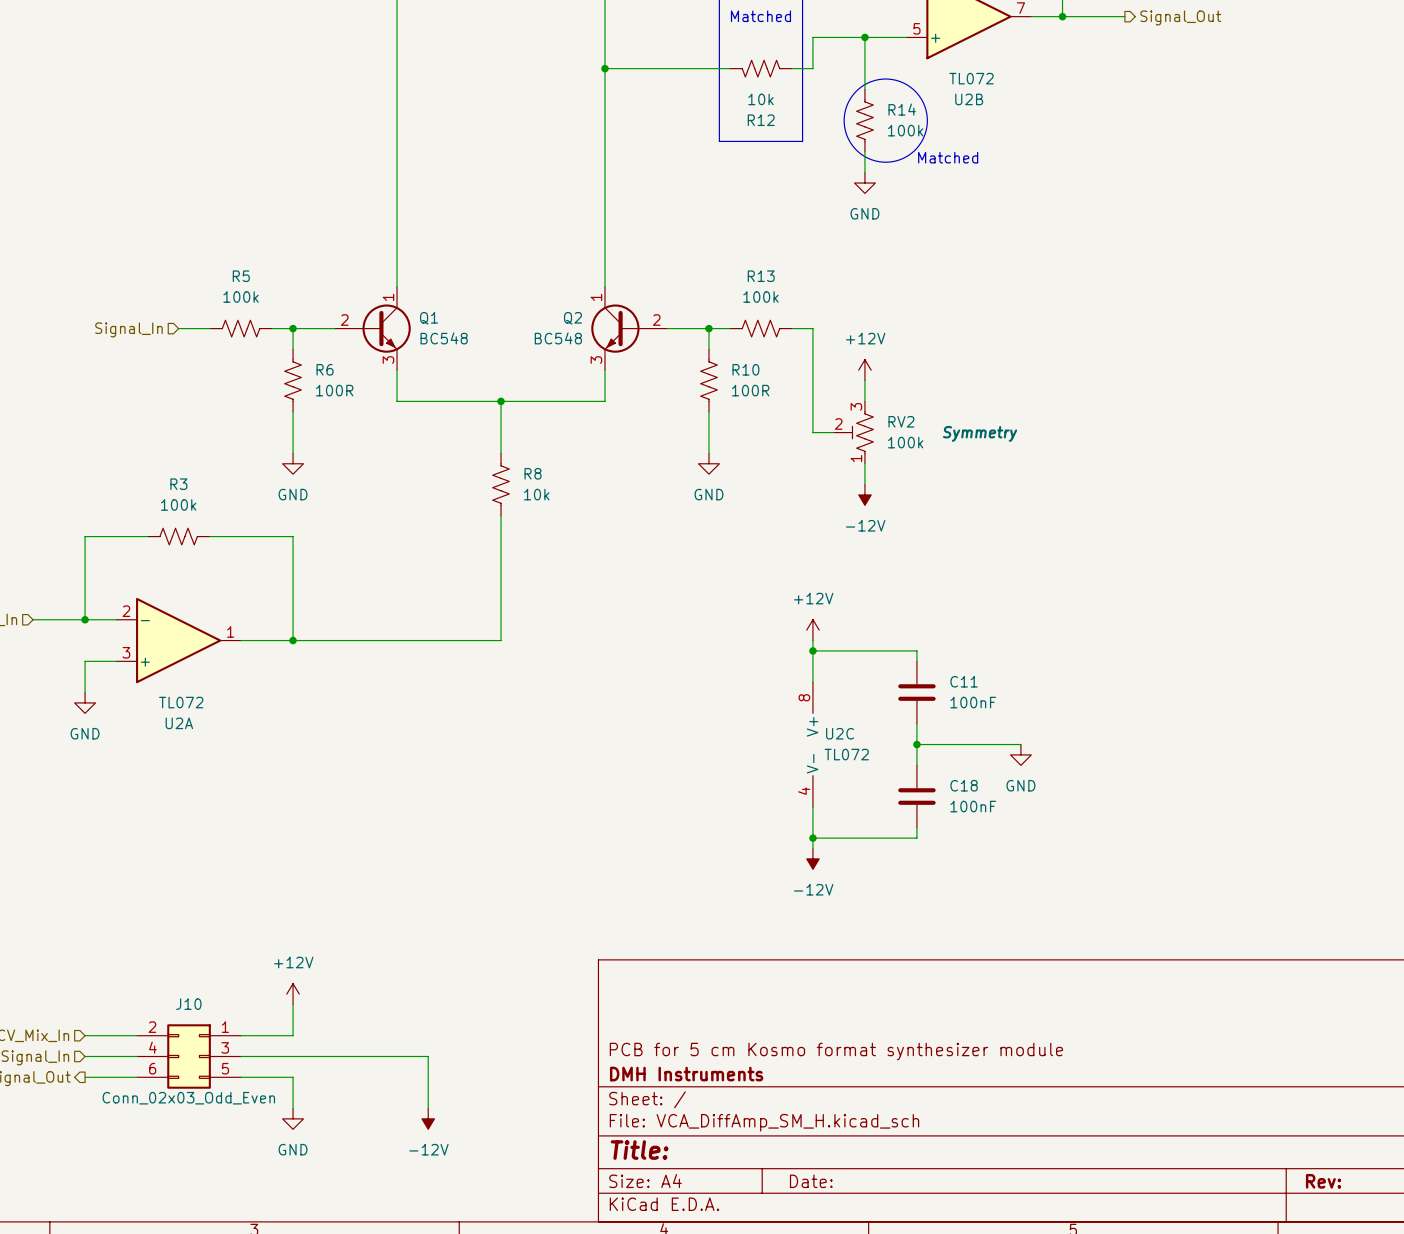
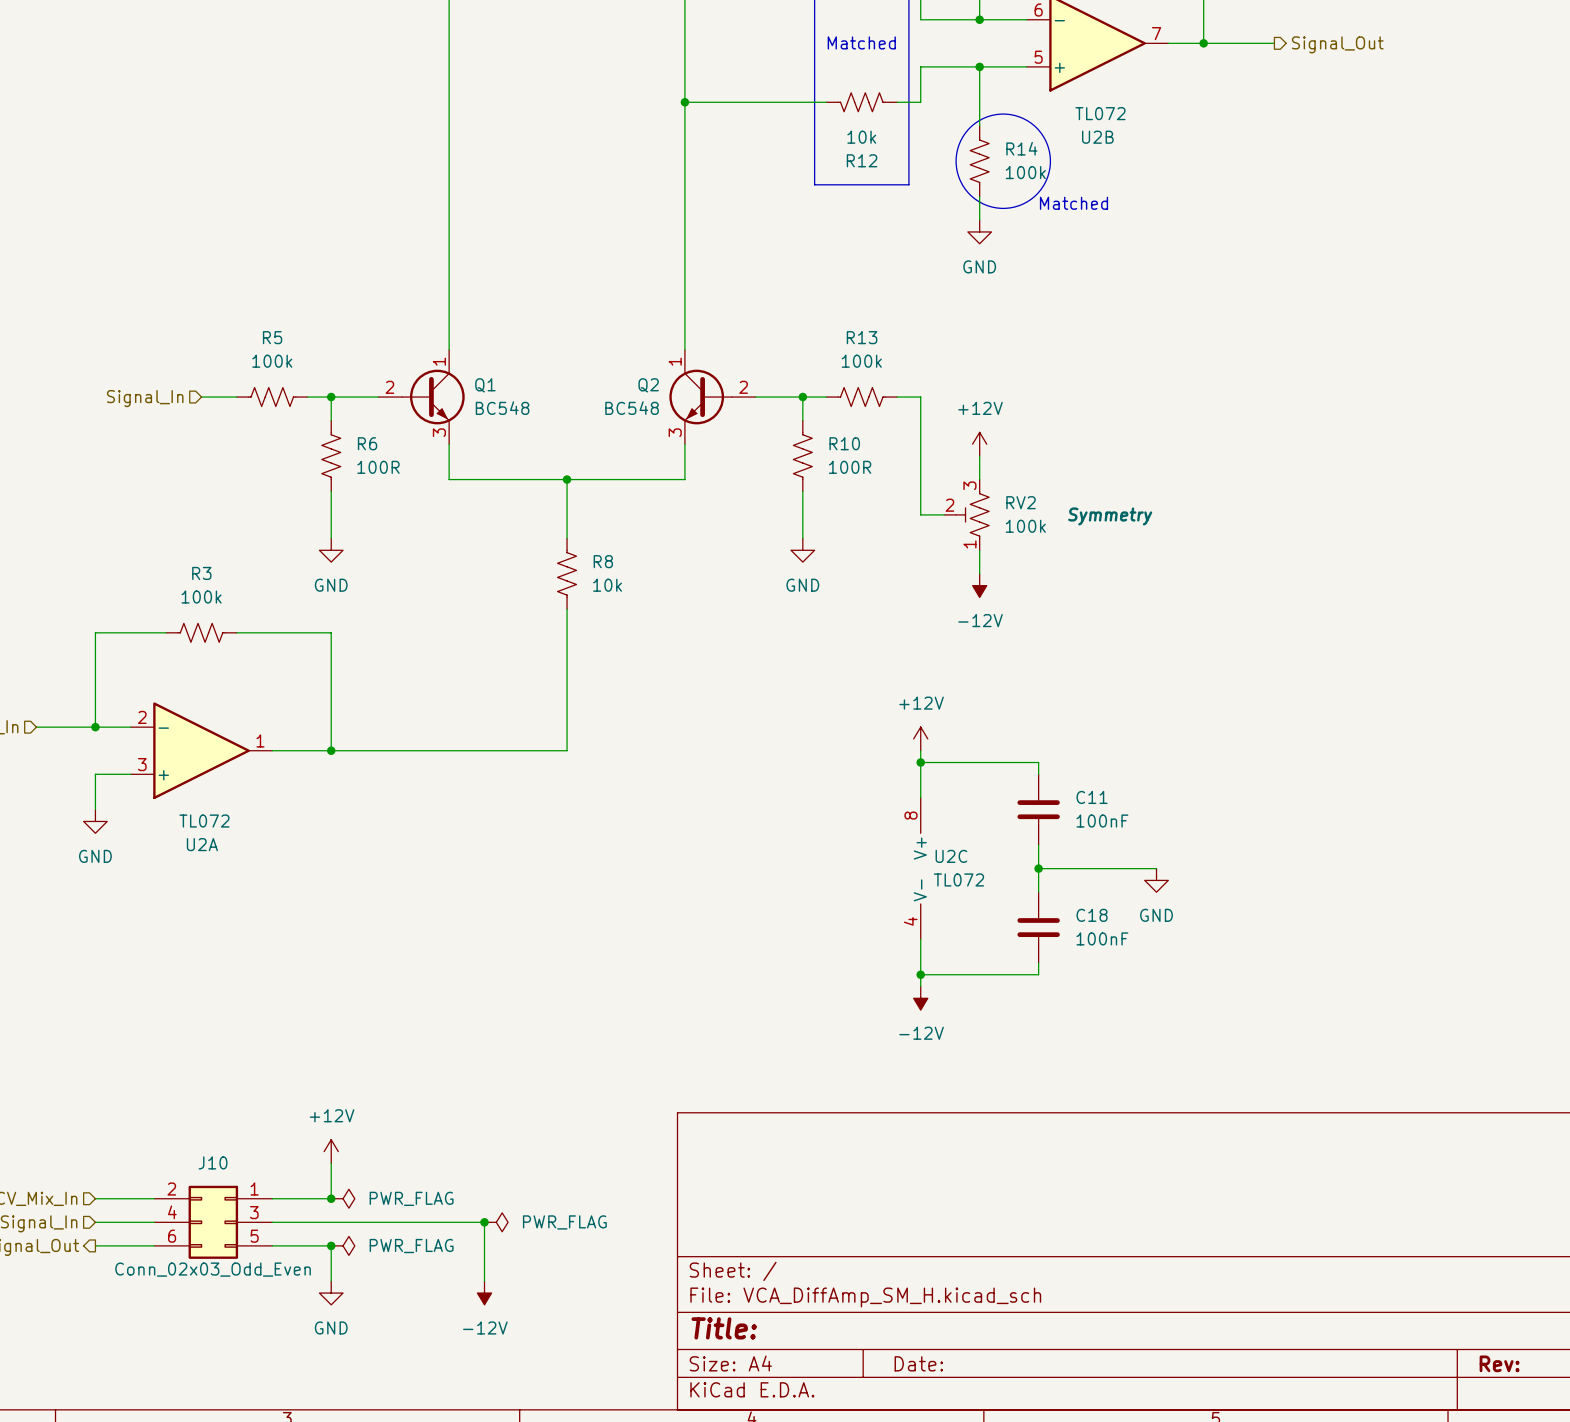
junction: none -> (331, 1198)
power symbol: none -> PWR_FLAG (343, 1198)
title block: PCB for 5 cm Kosmo format synthesizer module (836, 1051) -> none
junction: none -> (484, 1222)
power symbol: none -> PWR_FLAG (496, 1222)
title block: DMH Instruments (686, 1074) -> none
junction: none -> (331, 1245)
power symbol: none -> PWR_FLAG (343, 1245)

